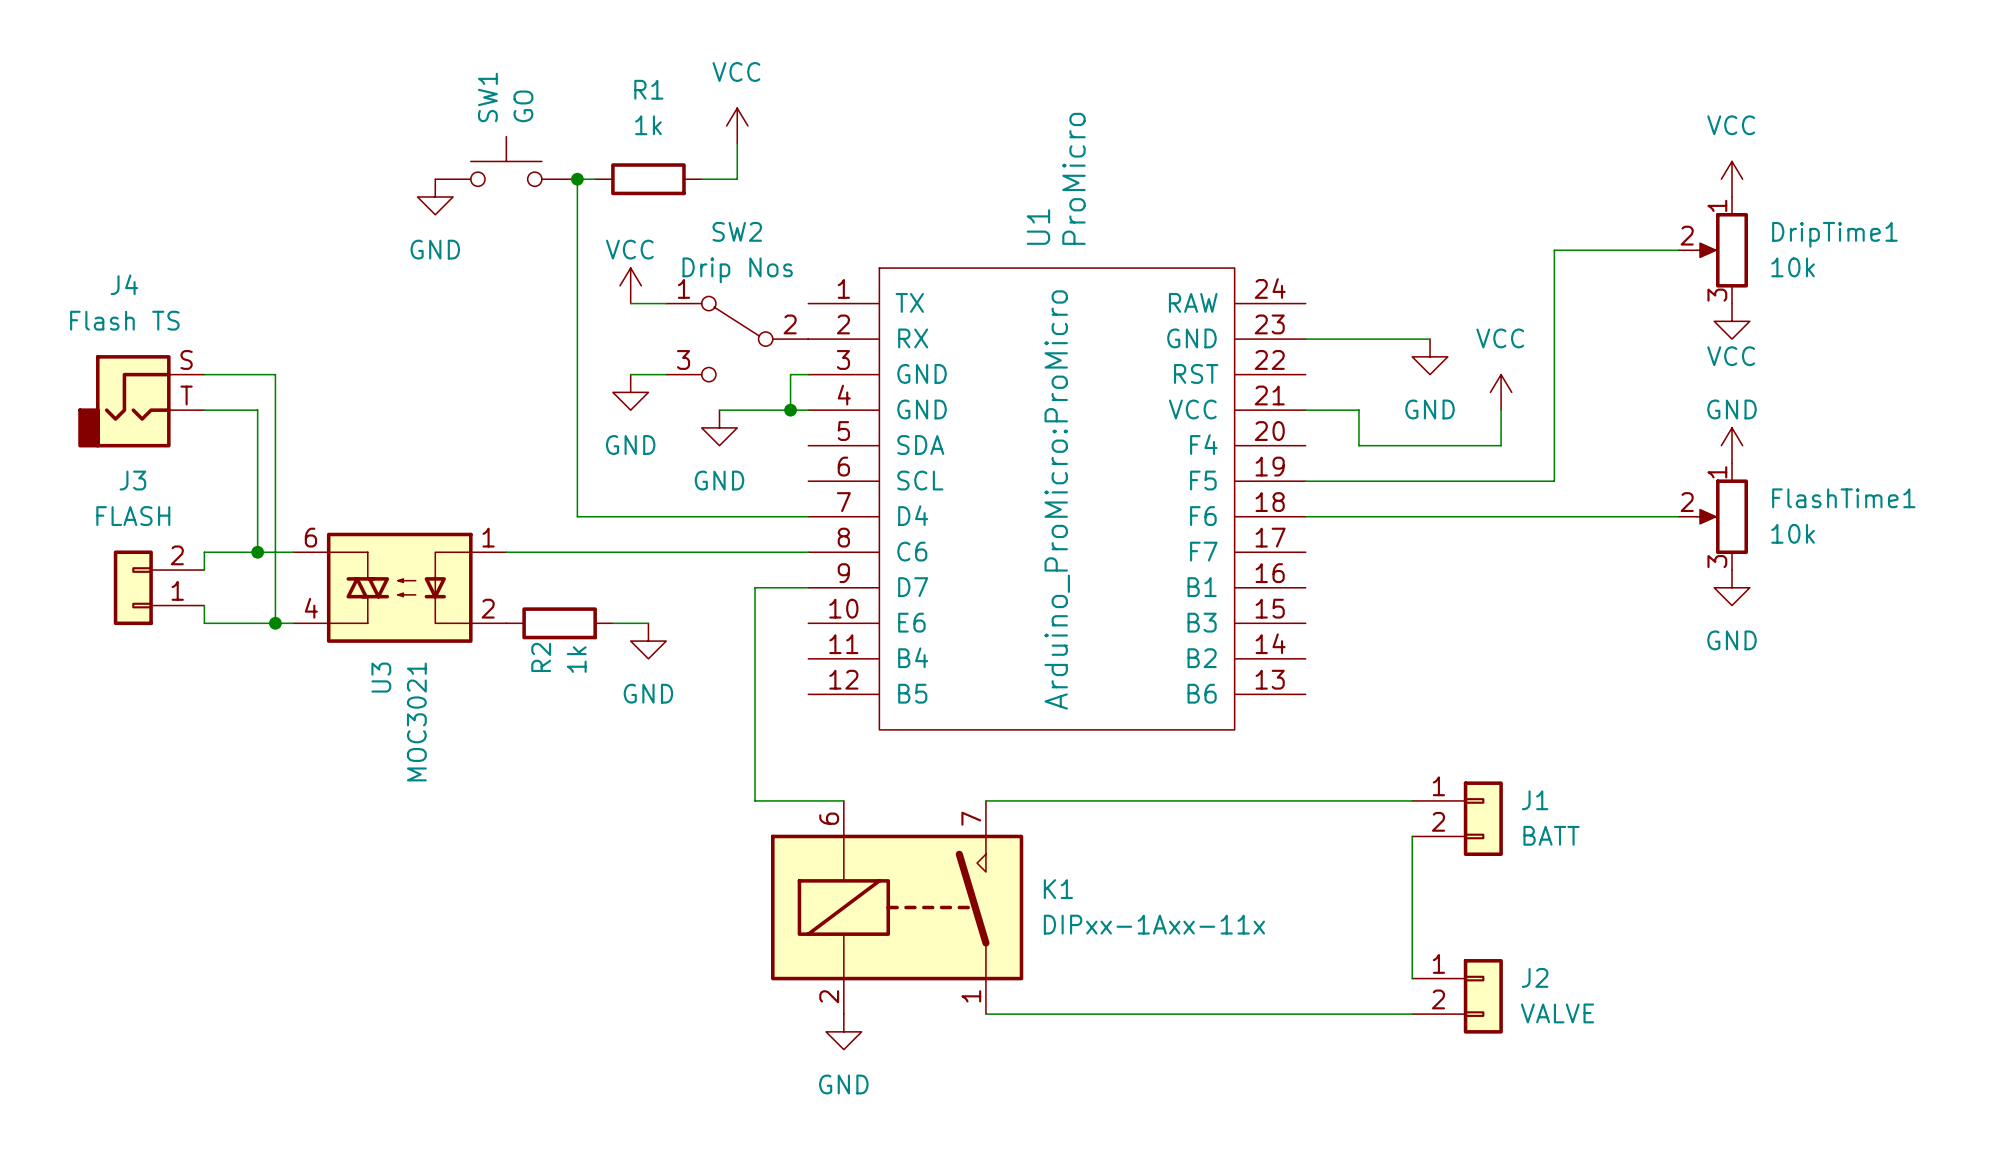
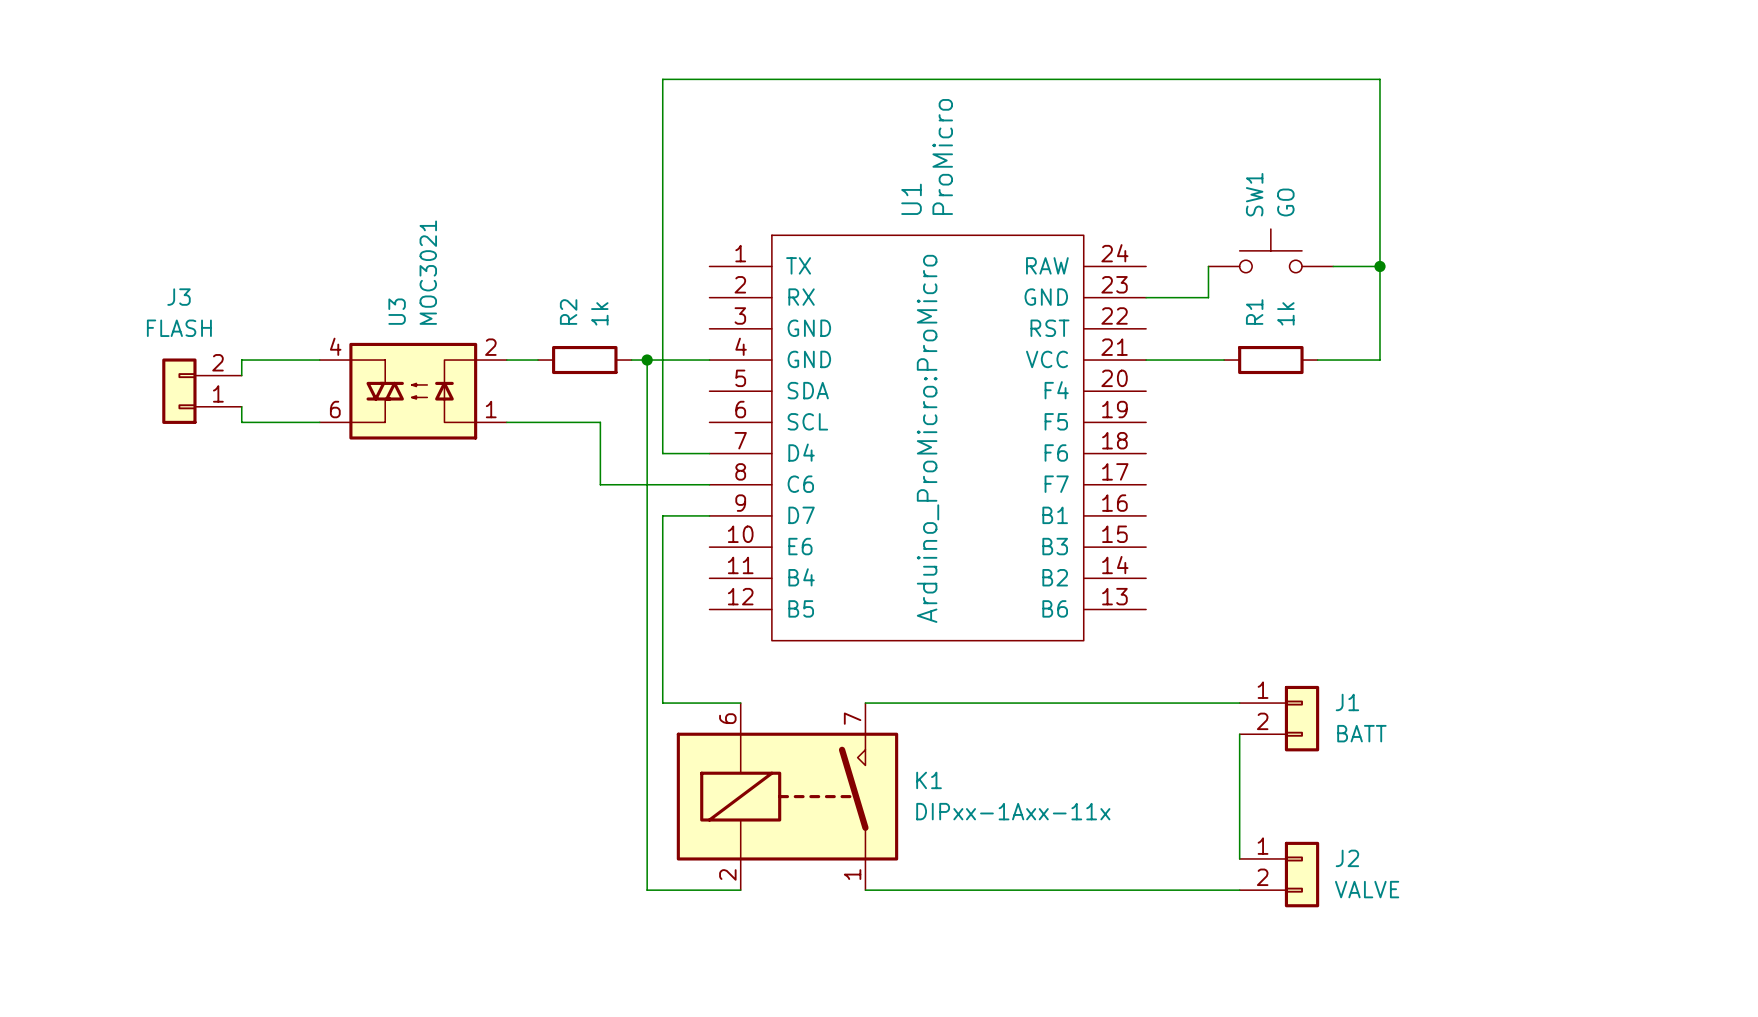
R1 name rotation: 0° (648, 89) -> 90° counterclockwise (1254, 312)
R1 value rotation: 0° (648, 125) -> 90° counterclockwise (1285, 313)
power symbol: VCC (737, 125) -> none
wire: (737, 143) (737, 179) (701, 179) -> none
SW1 position: (506, 161) -> (1270, 250)
junction: (577, 179) -> none
wire: (595, 179) (577, 179) (577, 516) (755, 516) -> (1317, 360) (1379, 360) (1379, 79) (662, 79) (662, 453)
R1 position: (648, 179) -> (1270, 360)
power symbol: VCC (1732, 179) -> none
power symbol: GND (435, 196) -> none
wire: (1678, 250) (1554, 250) (1554, 481) (1305, 481) -> none
DripTime1: 10k (1713, 250) -> none
power symbol: VCC (630, 285) -> none
wire: (630, 303) (666, 303) -> none
wire: none -> (1333, 266) (1379, 266)
junction: none -> (1379, 266)
power symbol: GND (1732, 321) -> none
SW2: Drip Nos (737, 339) -> none
wire: (1376, 339) (1430, 339) -> (1208, 297) (1208, 266)
power symbol: GND (1430, 356) -> none
wire: (204, 374) (275, 374) (275, 410) -> (319, 360) (241, 360)
wire: (630, 374) (666, 374) -> (506, 360) (538, 360)
wire: (808, 374) (790, 374) (790, 410) -> none
power symbol: GND (630, 392) -> none
power symbol: VCC (1501, 392) -> none
J4: Flash TS (141, 401) -> none
wire: (204, 410) (257, 410) (257, 552) -> none
wire: none -> (647, 360) (647, 890) (740, 890)
junction position: (790, 410) -> (647, 360)
wire: (1358, 410) (1358, 445) (1501, 445) (1501, 410) -> (1192, 360) (1224, 360)
wire: (275, 427) (275, 463) -> none
power symbol: GND (719, 427) -> none
power symbol: VCC (1732, 445) -> none
wire: (275, 481) (275, 623) -> (241, 422) (319, 422)
wire: (1305, 516) (1678, 516) -> none
FlashTime1: 10k (1713, 516) -> none
junction: (257, 552) -> none
wire: (293, 552) (204, 552) (204, 570) -> none
wire: (506, 552) (683, 552) -> (506, 422) (600, 422) (600, 484)
J3 position: (159, 587) -> (201, 391)
U3 flip: as is (399, 587) -> up-down (413, 391)
U3 position: (399, 587) -> (413, 391)
power symbol: GND (1732, 587) -> none
wire: (204, 605) (204, 623) (293, 623) -> none
junction: (275, 623) -> none
R2 position: (559, 623) -> (584, 360)
wire: (612, 623) (648, 623) -> none
power symbol: GND (648, 641) -> none
R2 name position: R2 (541, 657) -> R2 (568, 312)
R2 value position: 1k (576, 659) -> 1k (599, 313)
power symbol: GND (843, 1031) -> none

